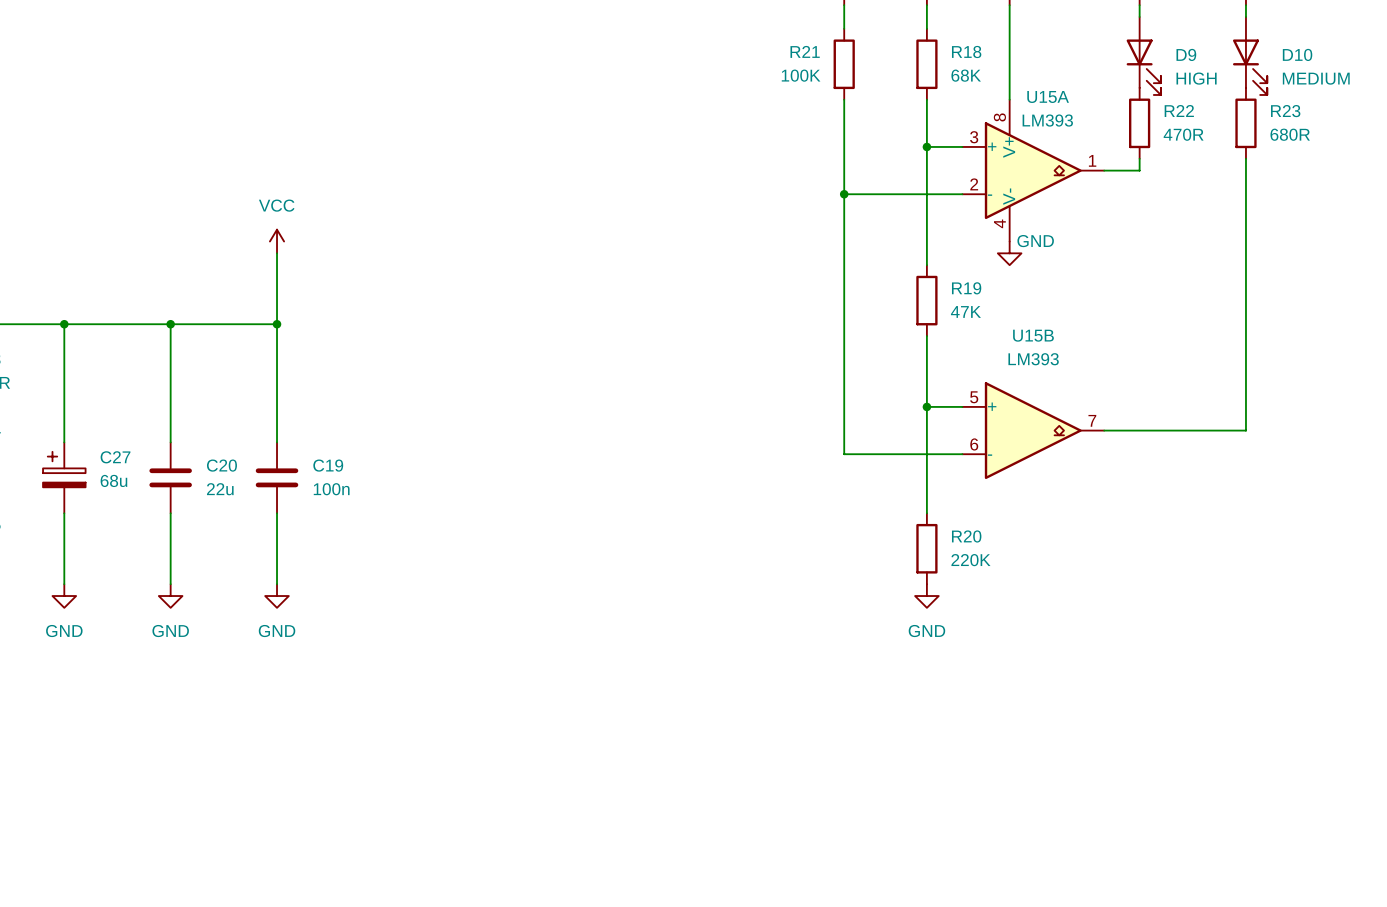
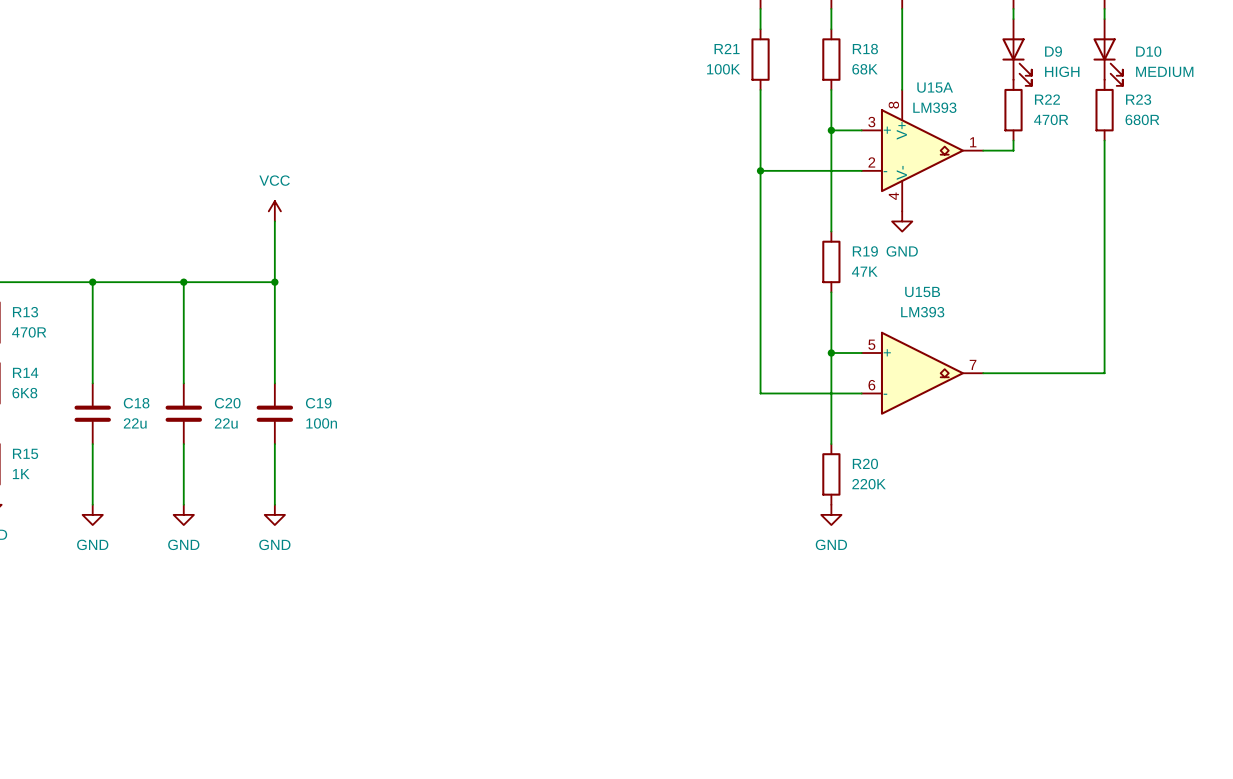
power symbol text position: GND (1035, 241) -> GND (902, 251)
C27: 68u (64, 477) -> none
C18: none -> 22u (92, 413)

